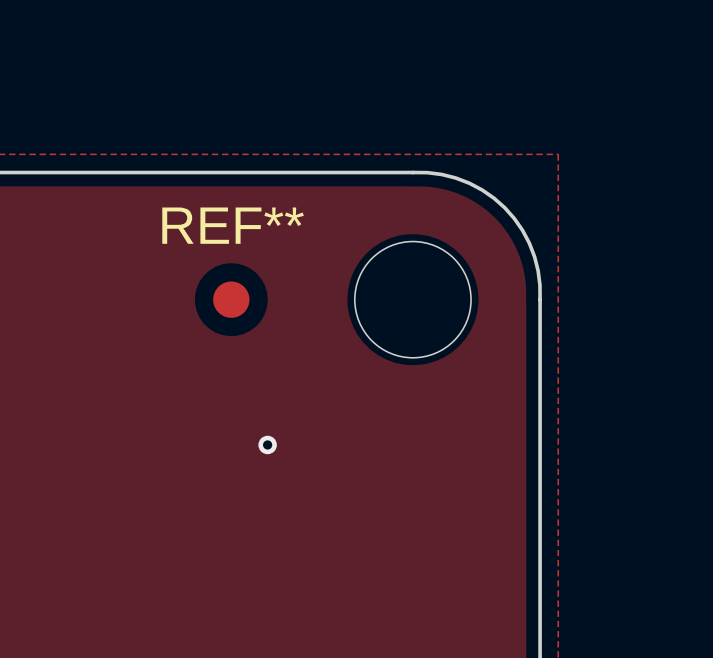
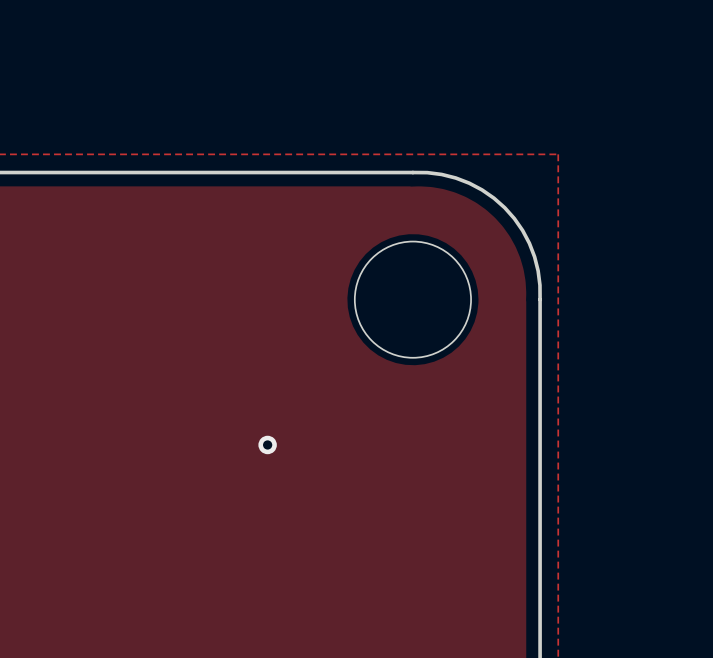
REF**: (231, 299) -> none

